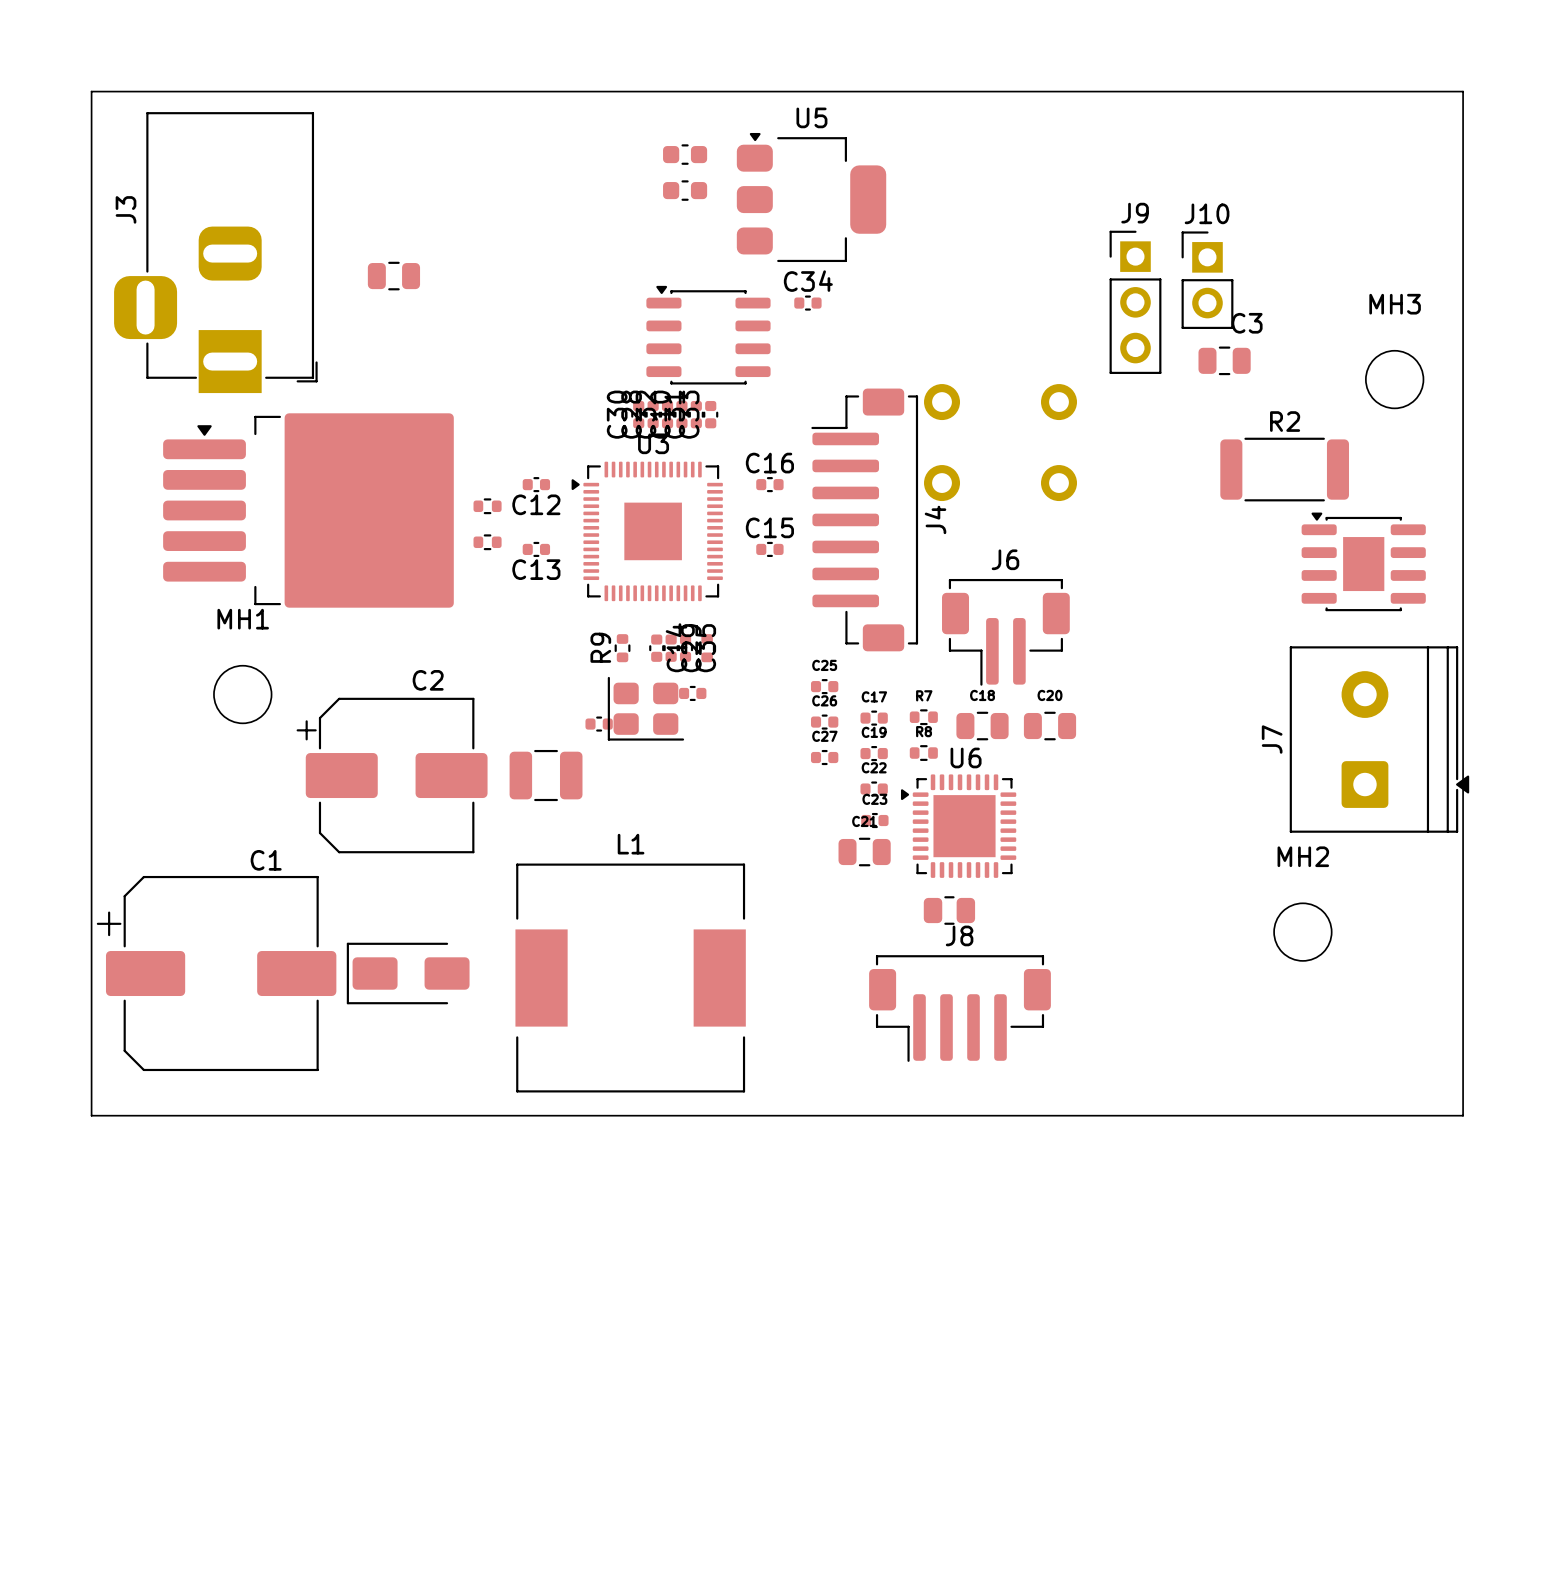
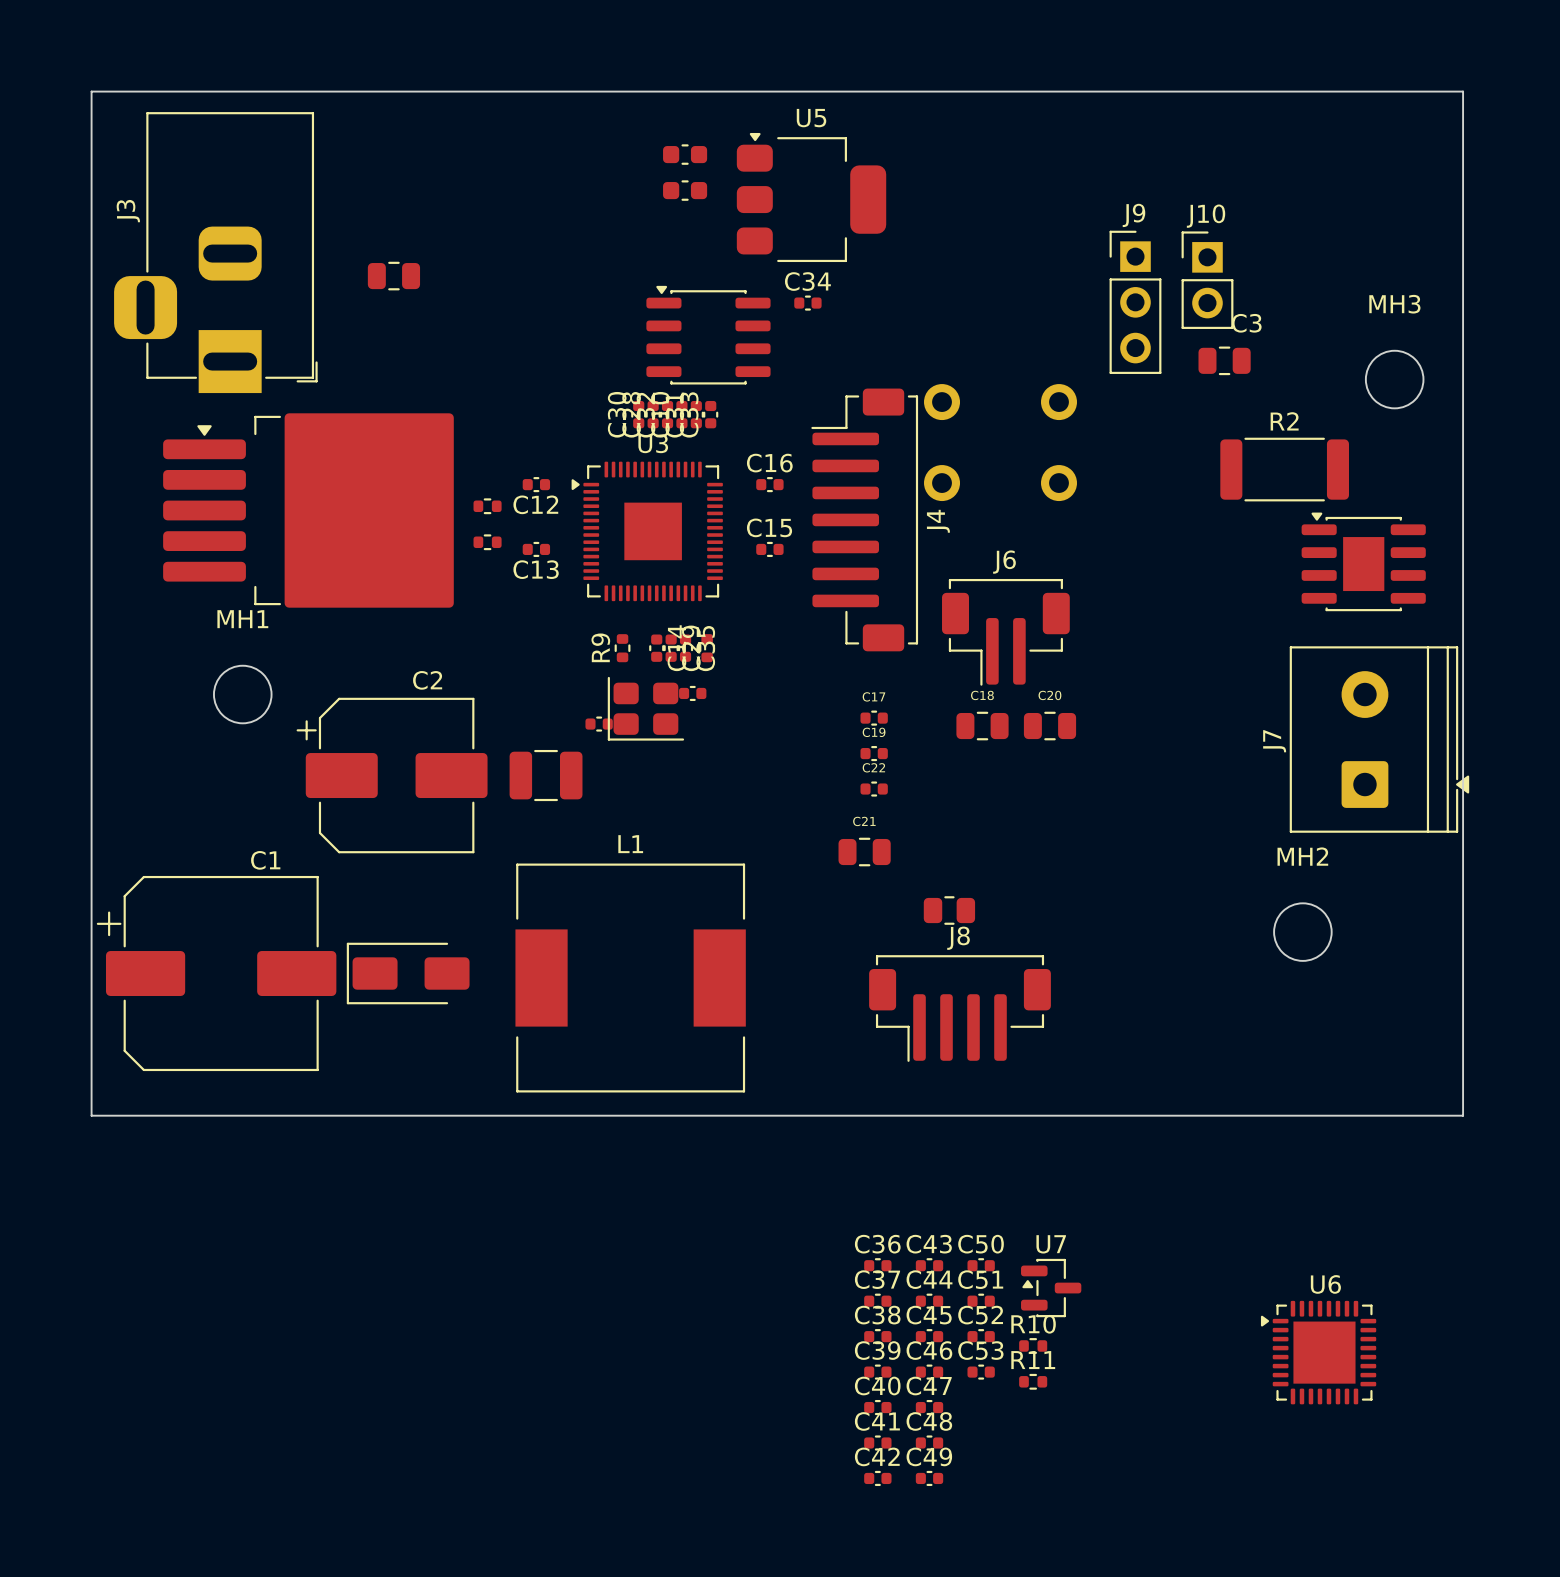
C25: (824, 686) -> none
R7: (923, 717) -> none
C26: (824, 722) -> none
R8: (923, 753) -> none
C27: (824, 757) -> none
C23: (874, 820) -> none
U6 position: (958, 826) -> (1318, 1352)
C36: none -> (877, 1265)
C43: none -> (929, 1265)
C50: none -> (981, 1265)
U7: none -> (1051, 1288)
C37: none -> (877, 1301)
C44: none -> (929, 1301)
C51: none -> (981, 1301)
C38: none -> (877, 1336)
C45: none -> (929, 1336)
C52: none -> (981, 1336)
R10: none -> (1033, 1345)
C39: none -> (877, 1372)
C46: none -> (929, 1372)
C53: none -> (981, 1372)
R11: none -> (1033, 1381)
C40: none -> (877, 1407)
C47: none -> (929, 1407)
C41: none -> (877, 1443)
C48: none -> (929, 1443)
C42: none -> (877, 1478)
C49: none -> (929, 1478)

